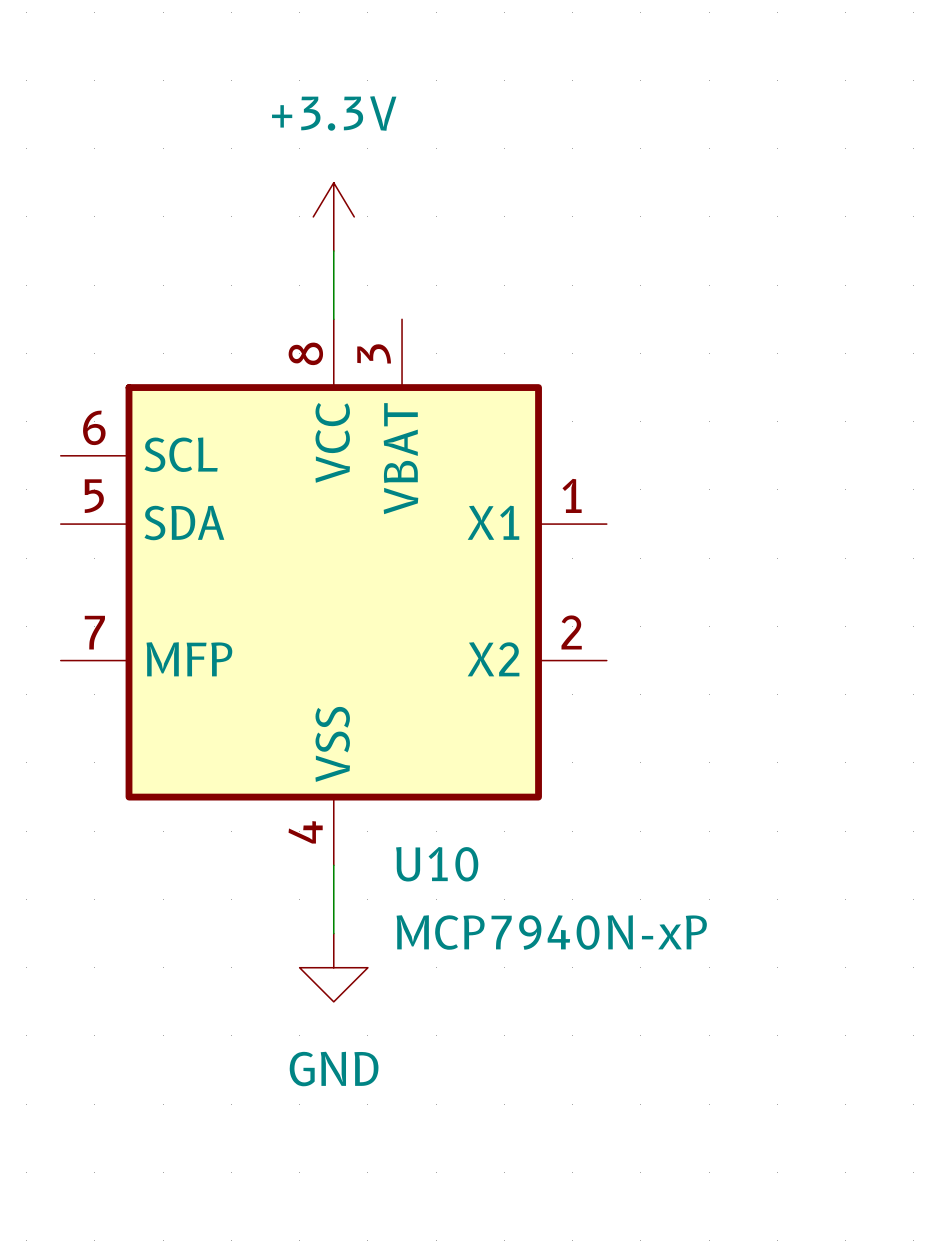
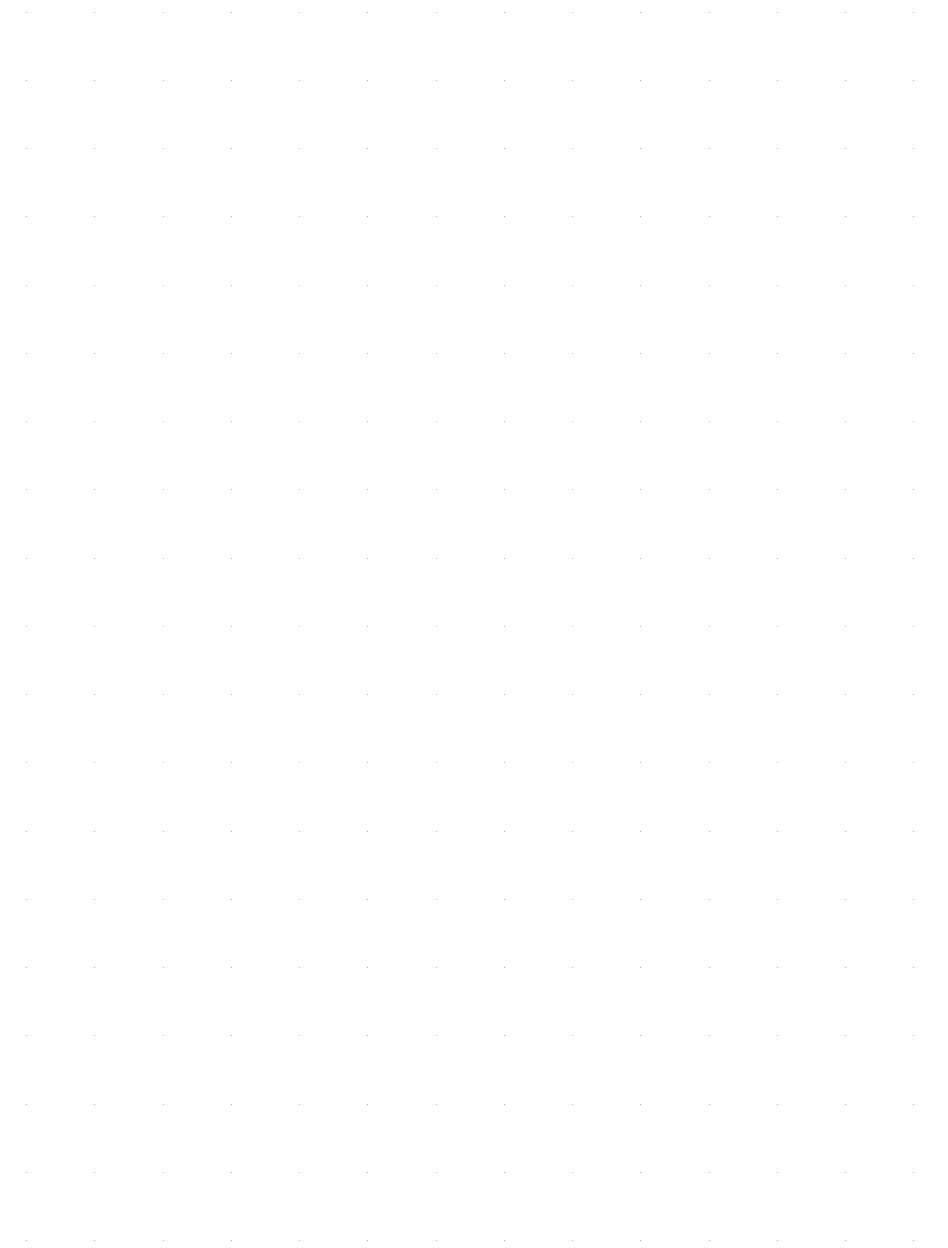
power symbol: +3.3V (333, 216) -> none
wire: (333, 251) (333, 319) -> none
U10: MCP7940N-xP (333, 592) -> none
wire: (333, 865) (333, 933) -> none
power symbol: GND (333, 967) -> none

